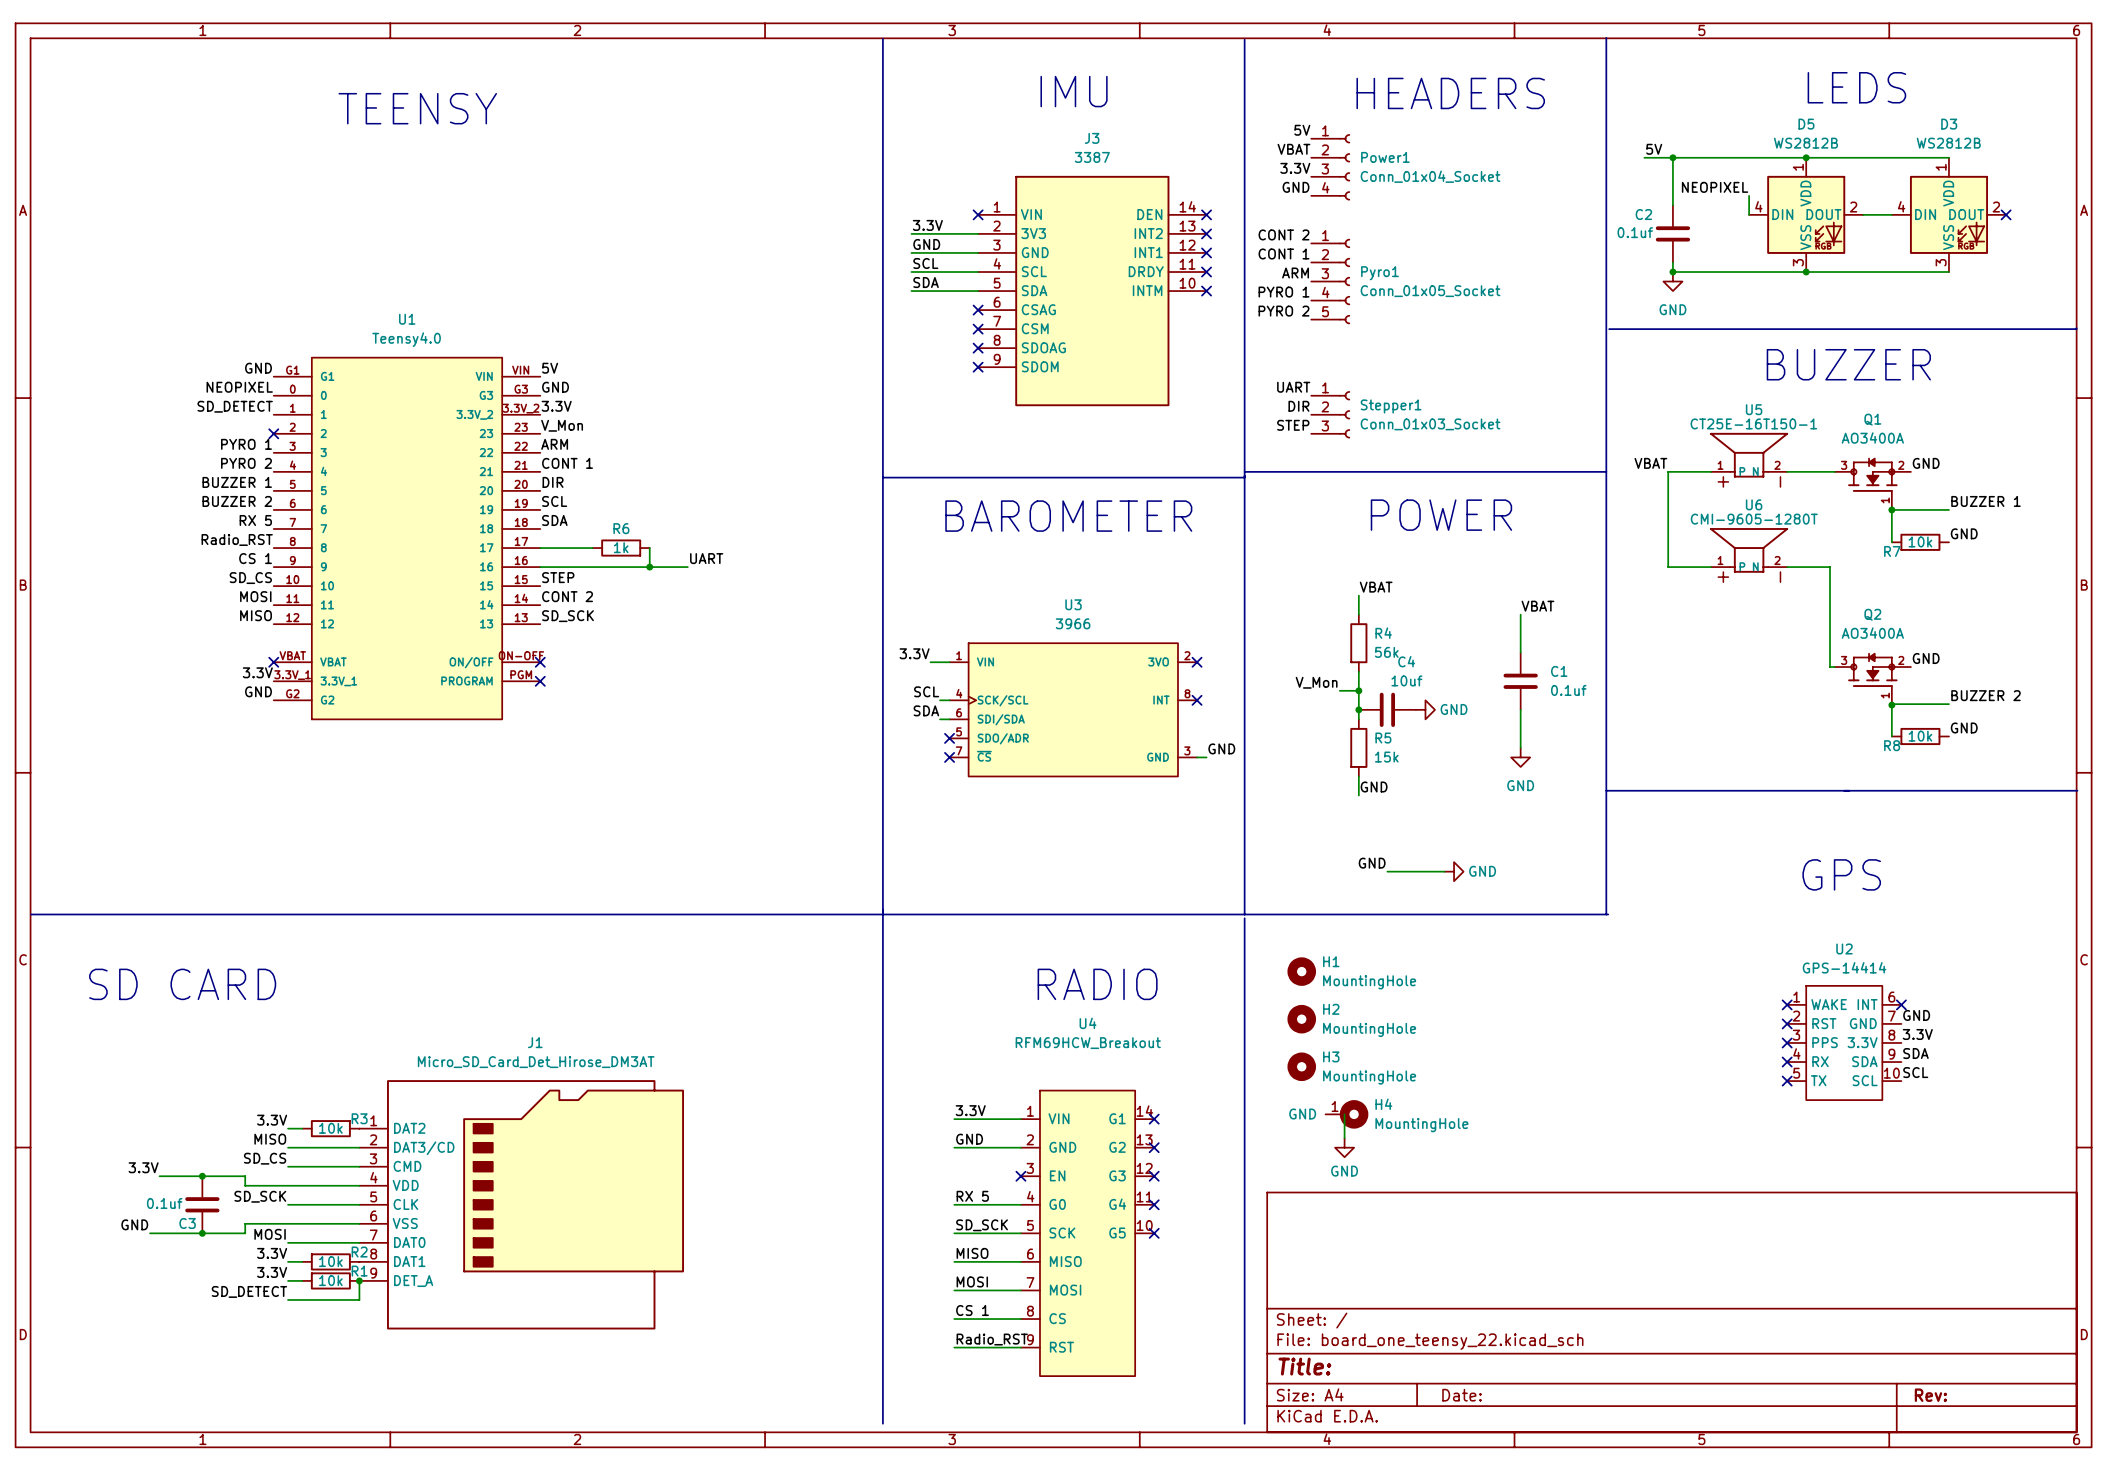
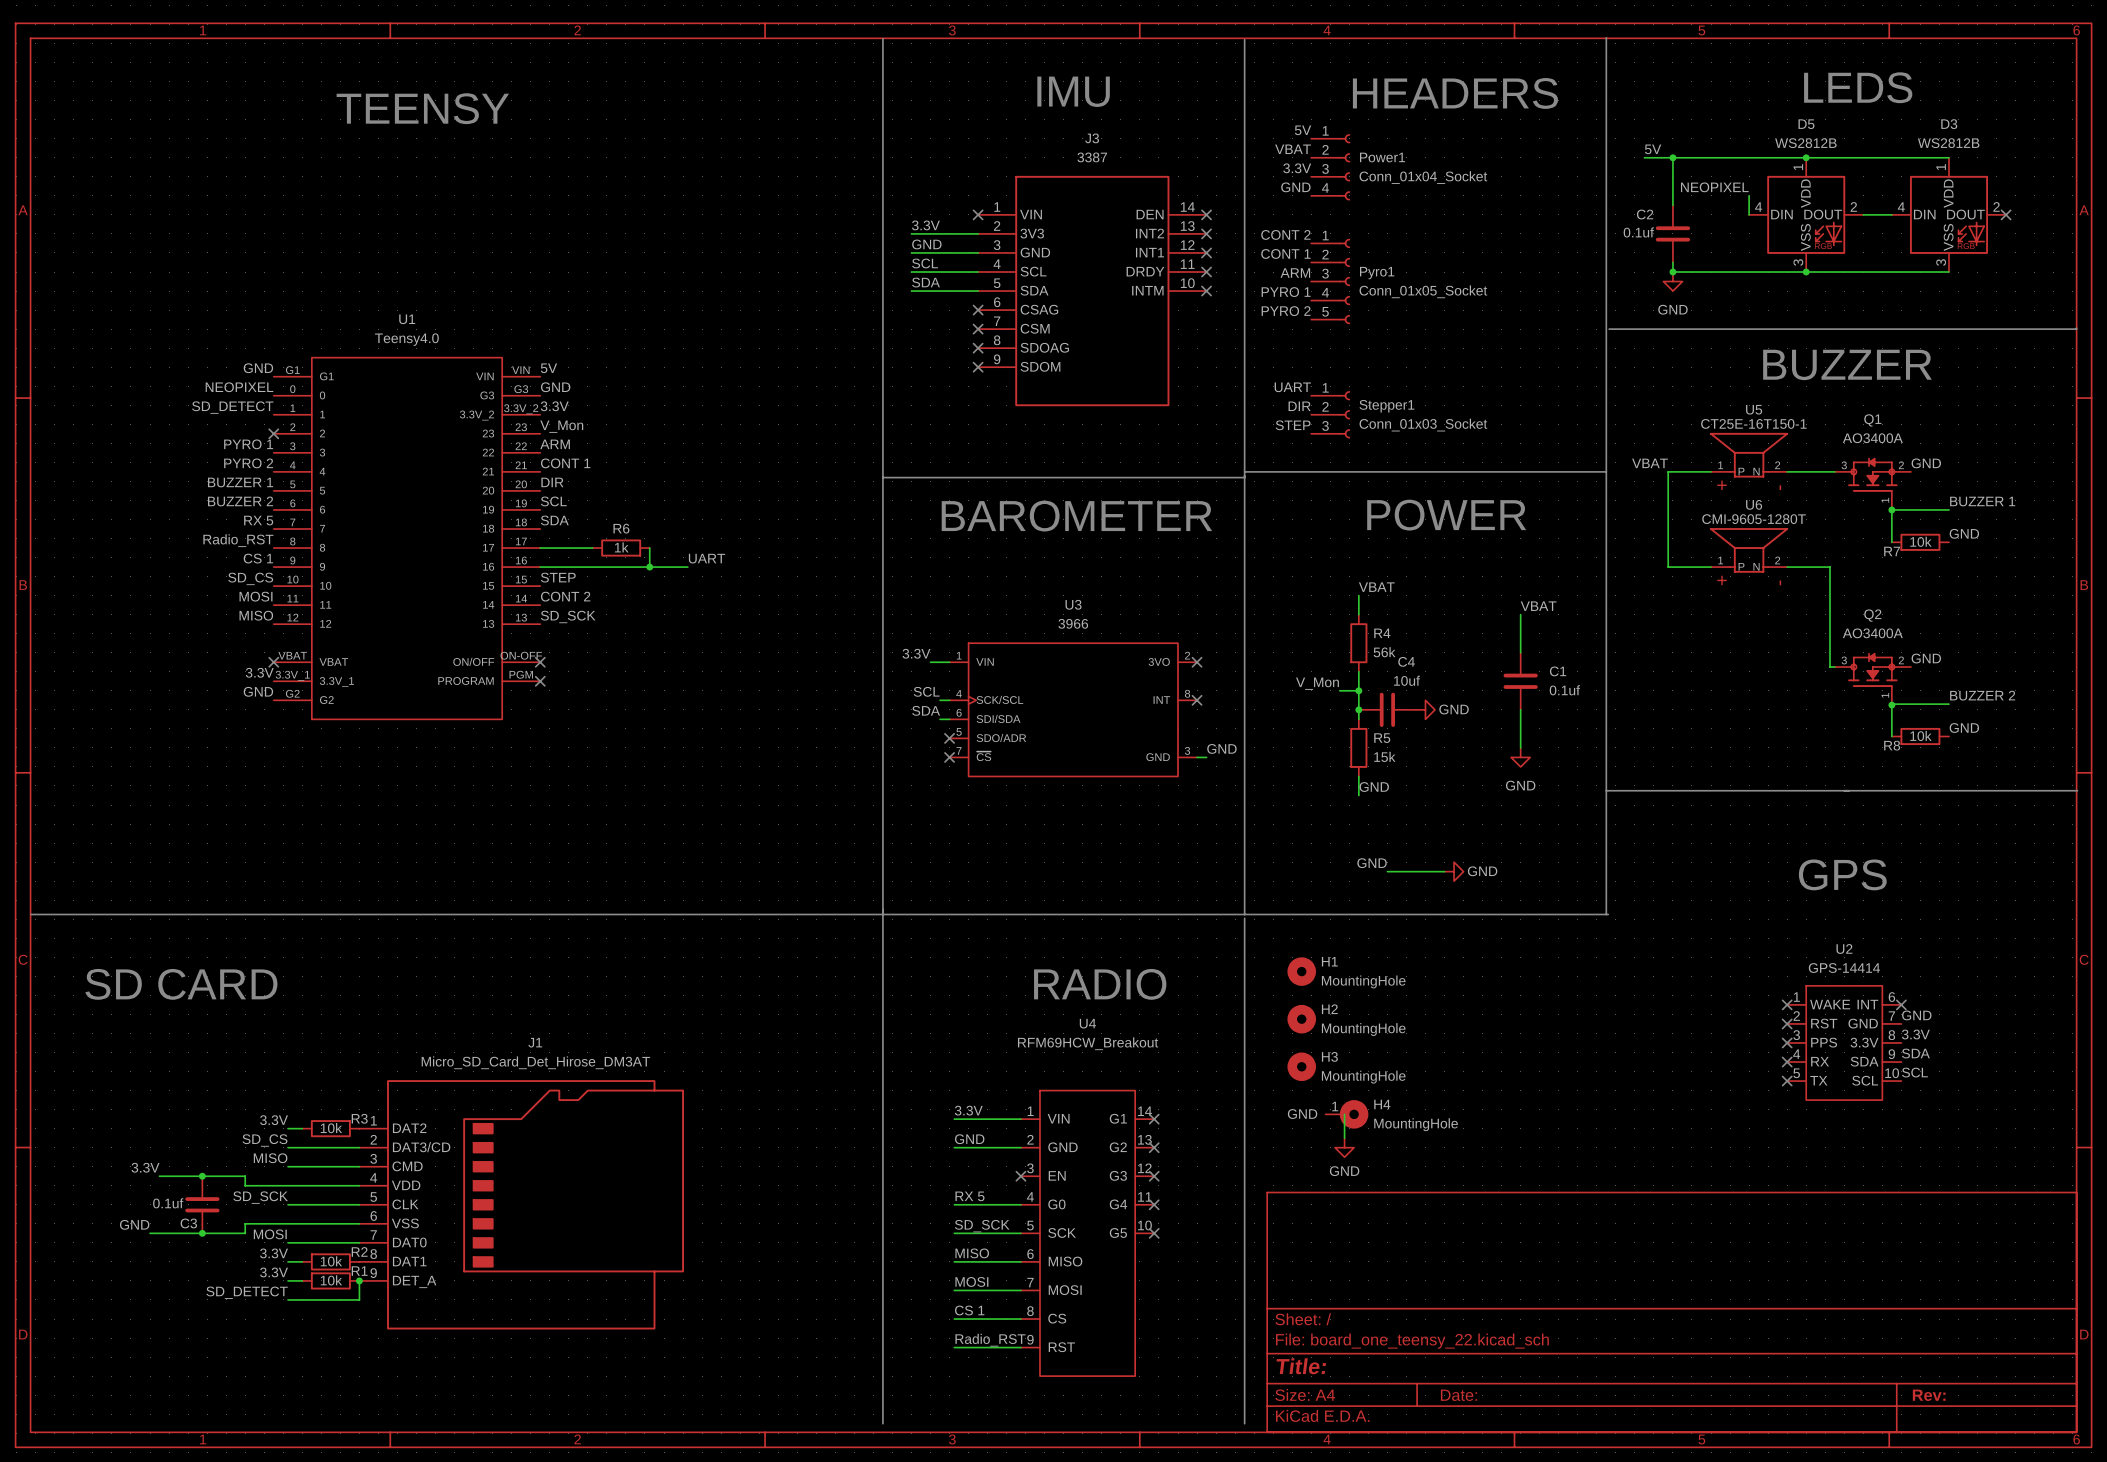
label: MISO (270, 1139) -> SD_CS (264, 1140)
label: SD_CS (265, 1158) -> MISO (270, 1158)

